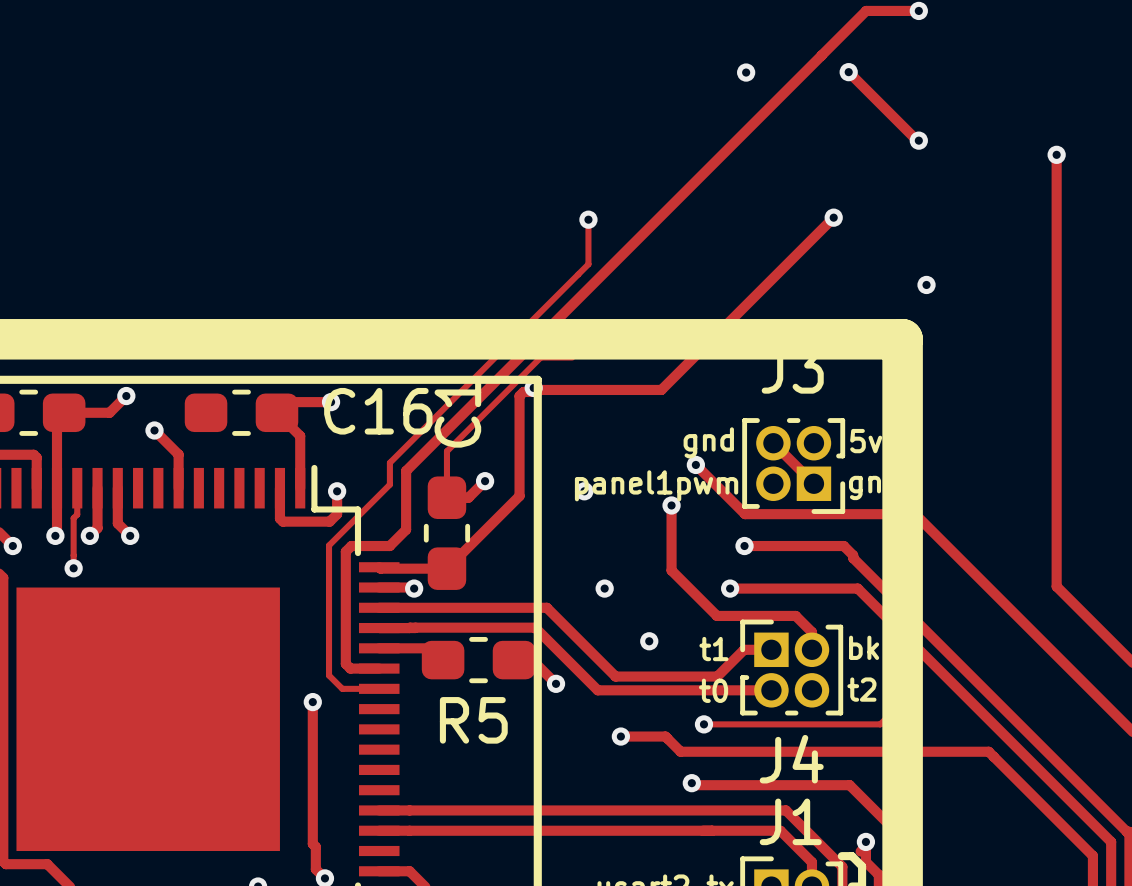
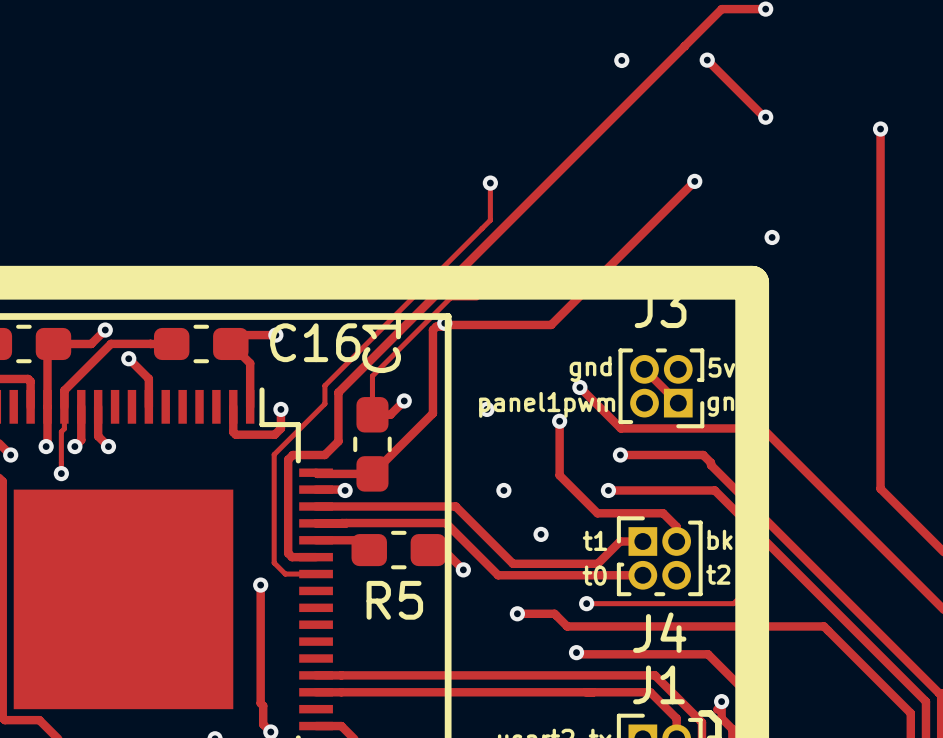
track: none -> (171, 343) (111, 343) (64, 390) (64, 406)

